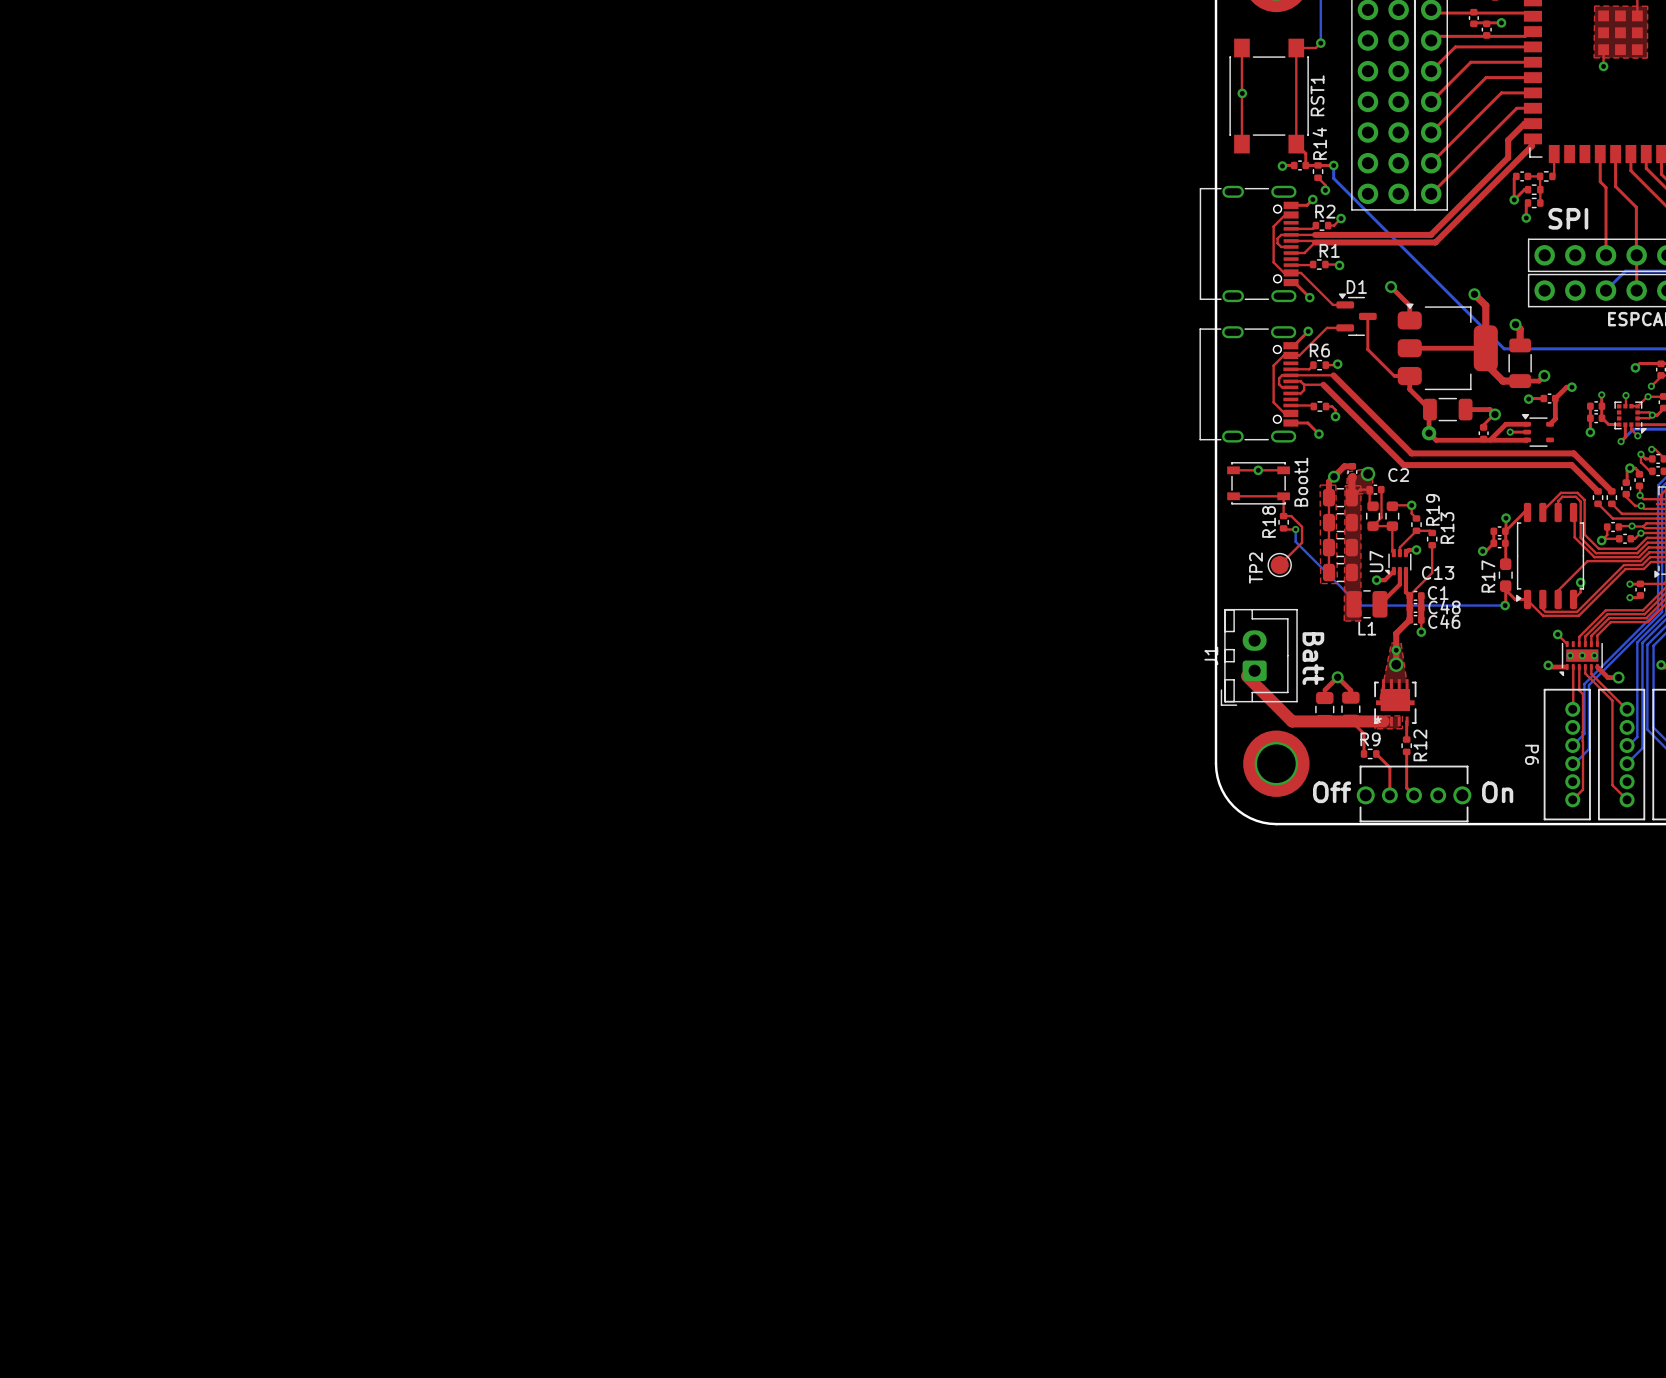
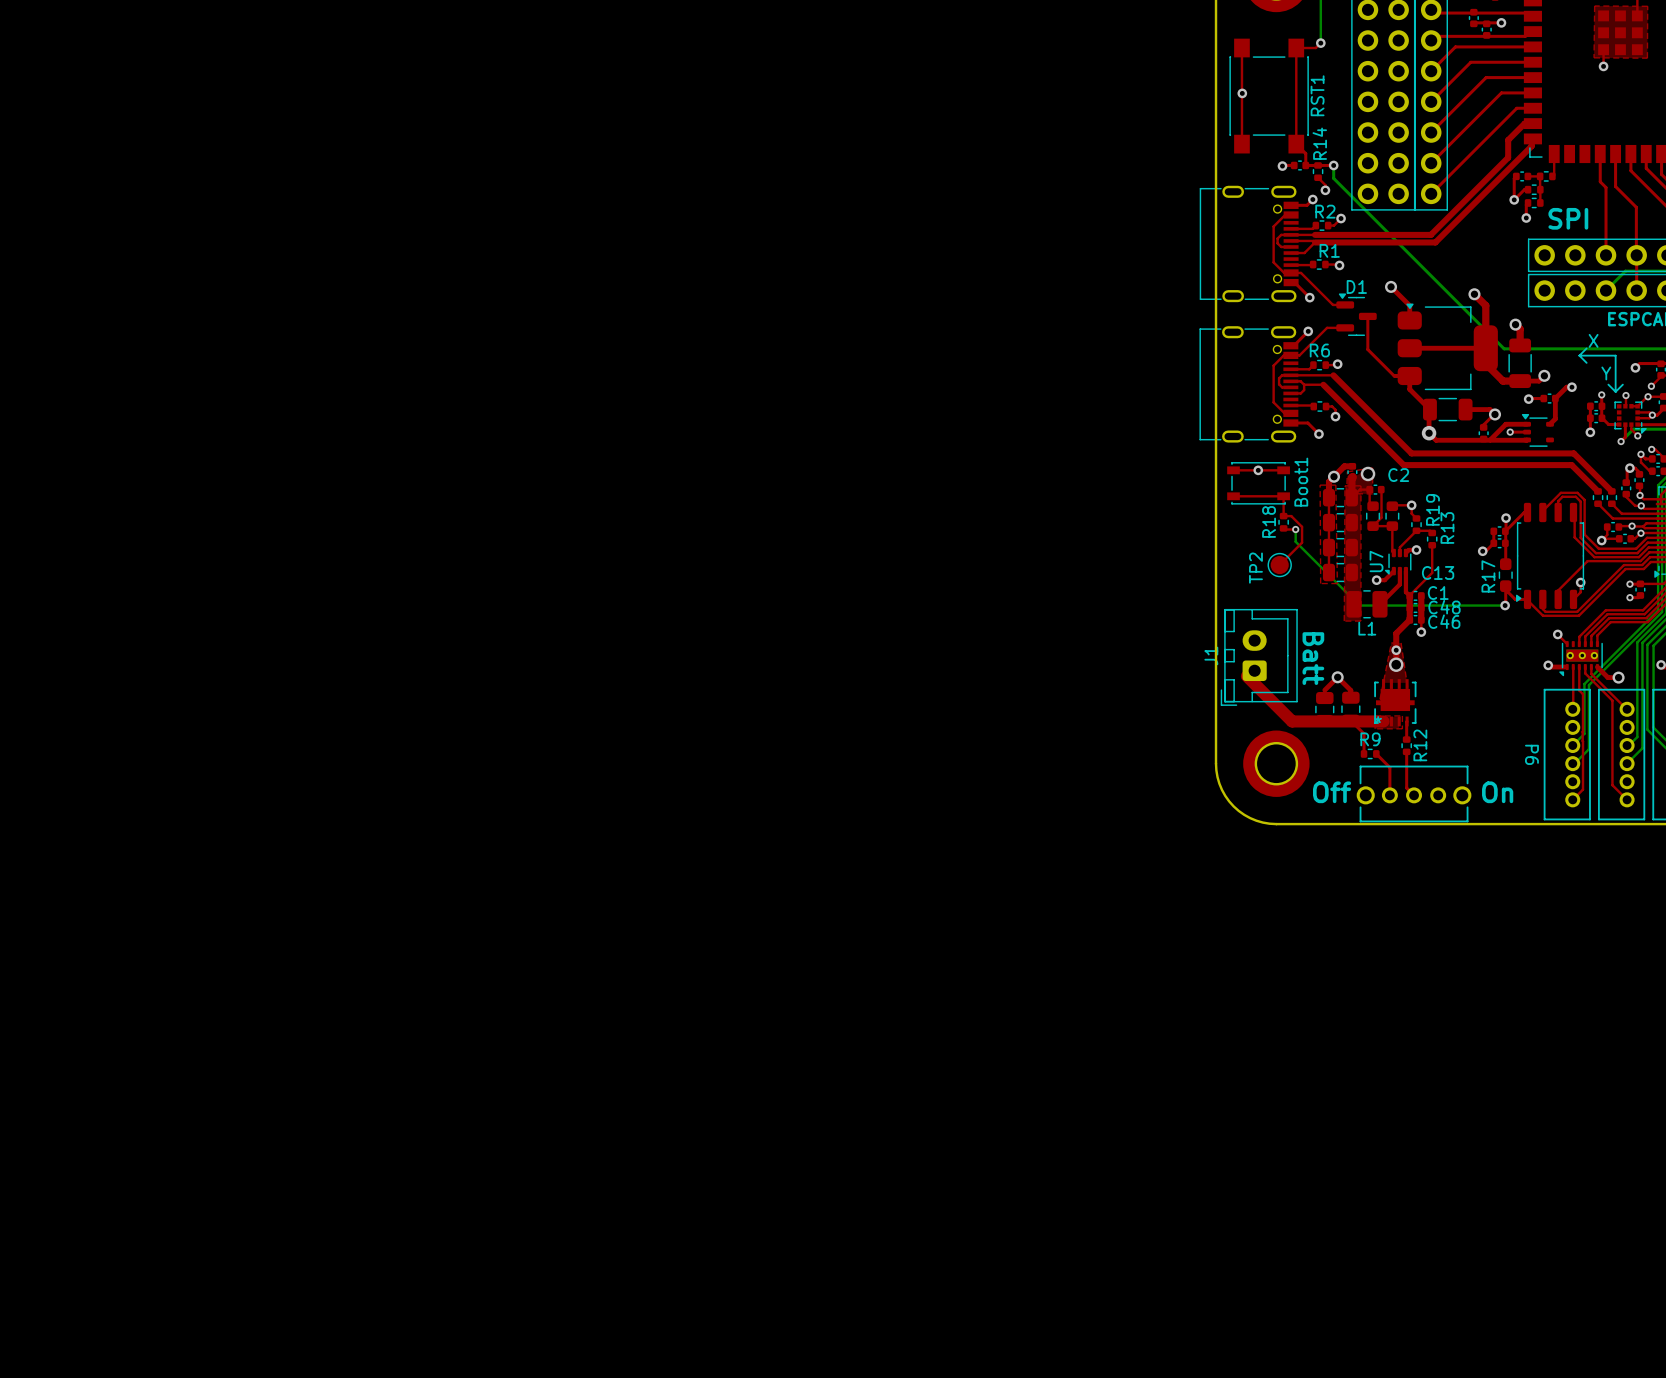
text: none -> X (1593, 340)
line: none -> (1586, 348) (1579, 355)
line: none -> (1579, 355) (1615, 355) (1615, 391)
line: none -> (1579, 355) (1586, 362)
text: none -> Y (1606, 373)
line: none -> (1608, 384) (1615, 391)
line: none -> (1622, 384) (1615, 391)

